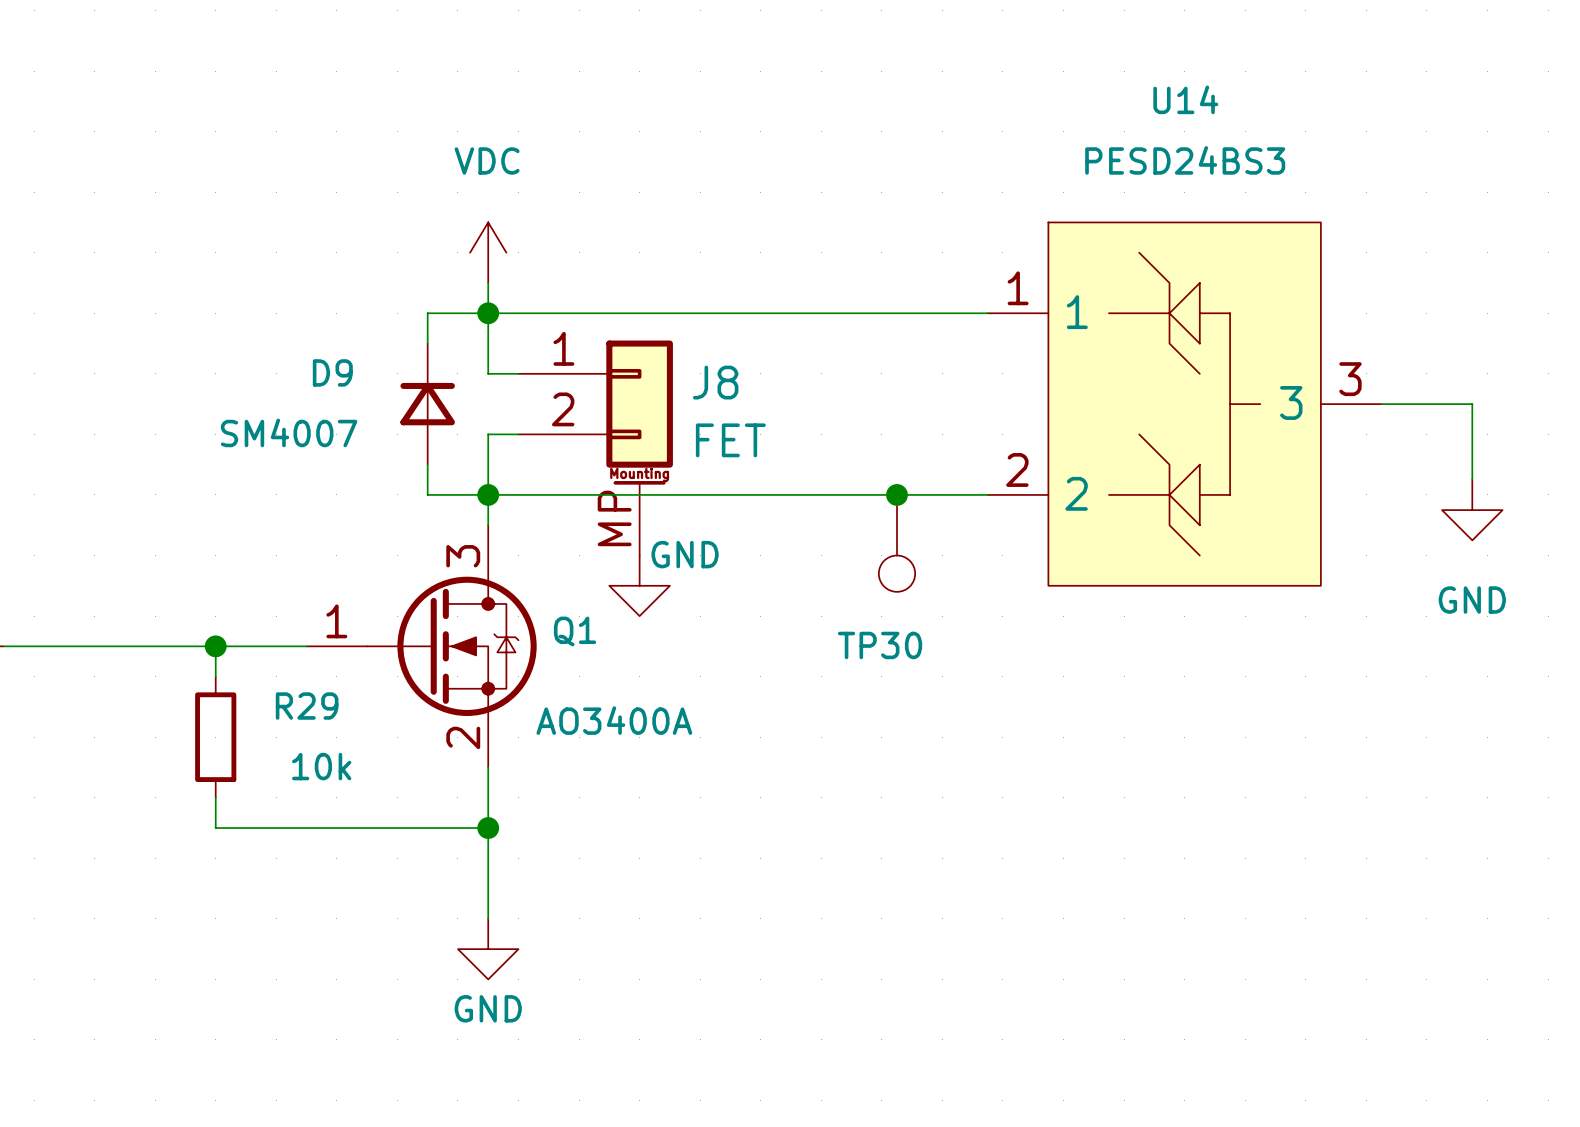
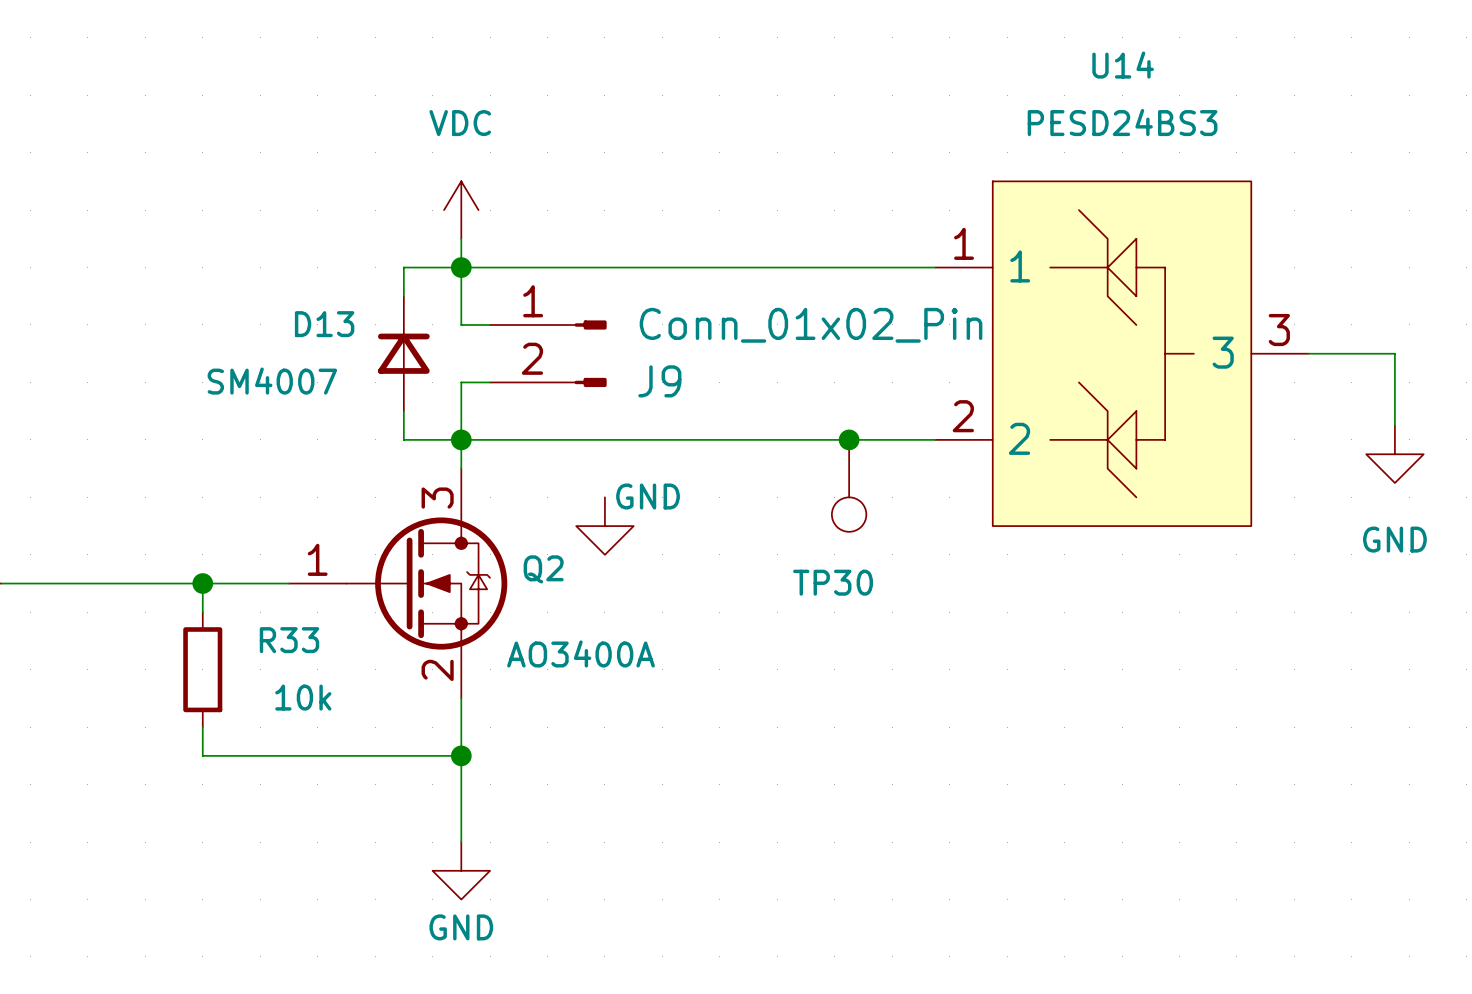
D9 name: D9 (332, 372) -> D13 (324, 324)
J9: none -> Conn_01x02_Pin (548, 353)
J8: FET (595, 448) -> none
Q1 name: Q1 (575, 631) -> Q2 (543, 569)
R29 name: R29 (307, 706) -> R33 (289, 640)

